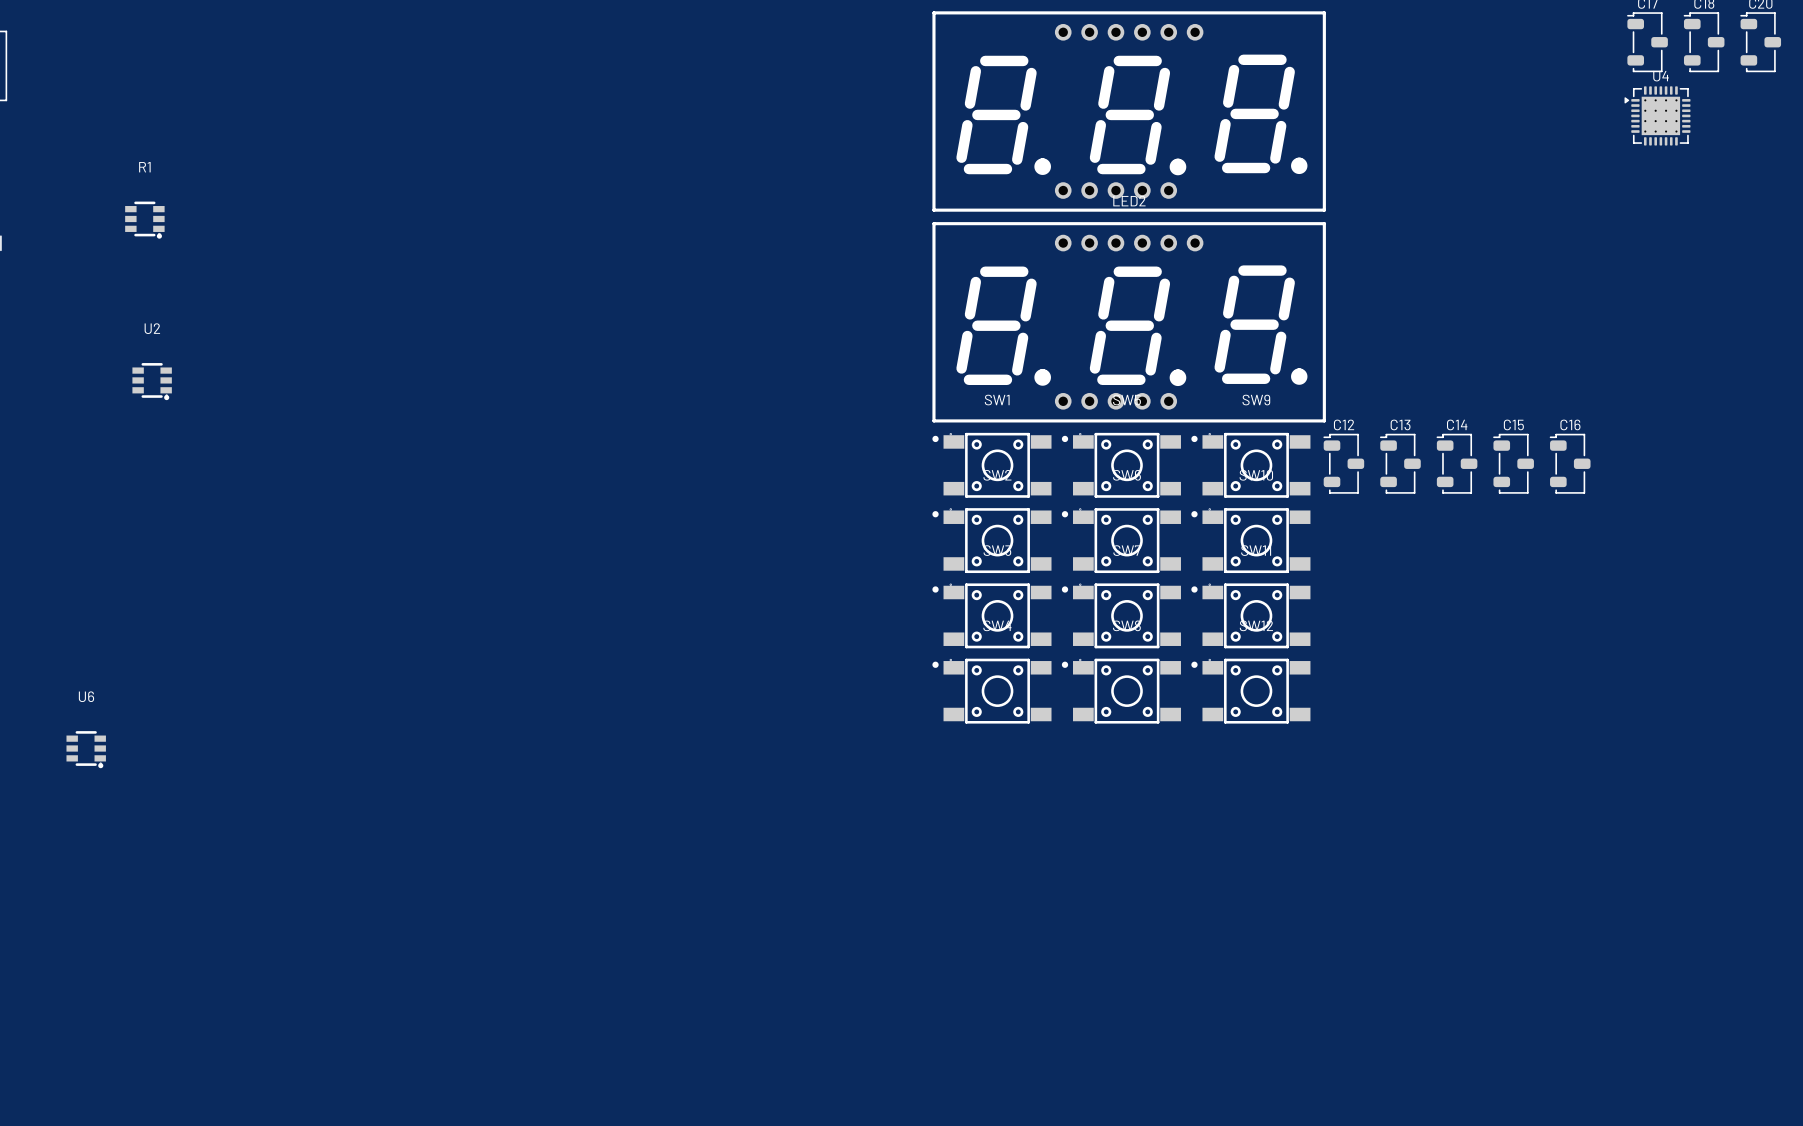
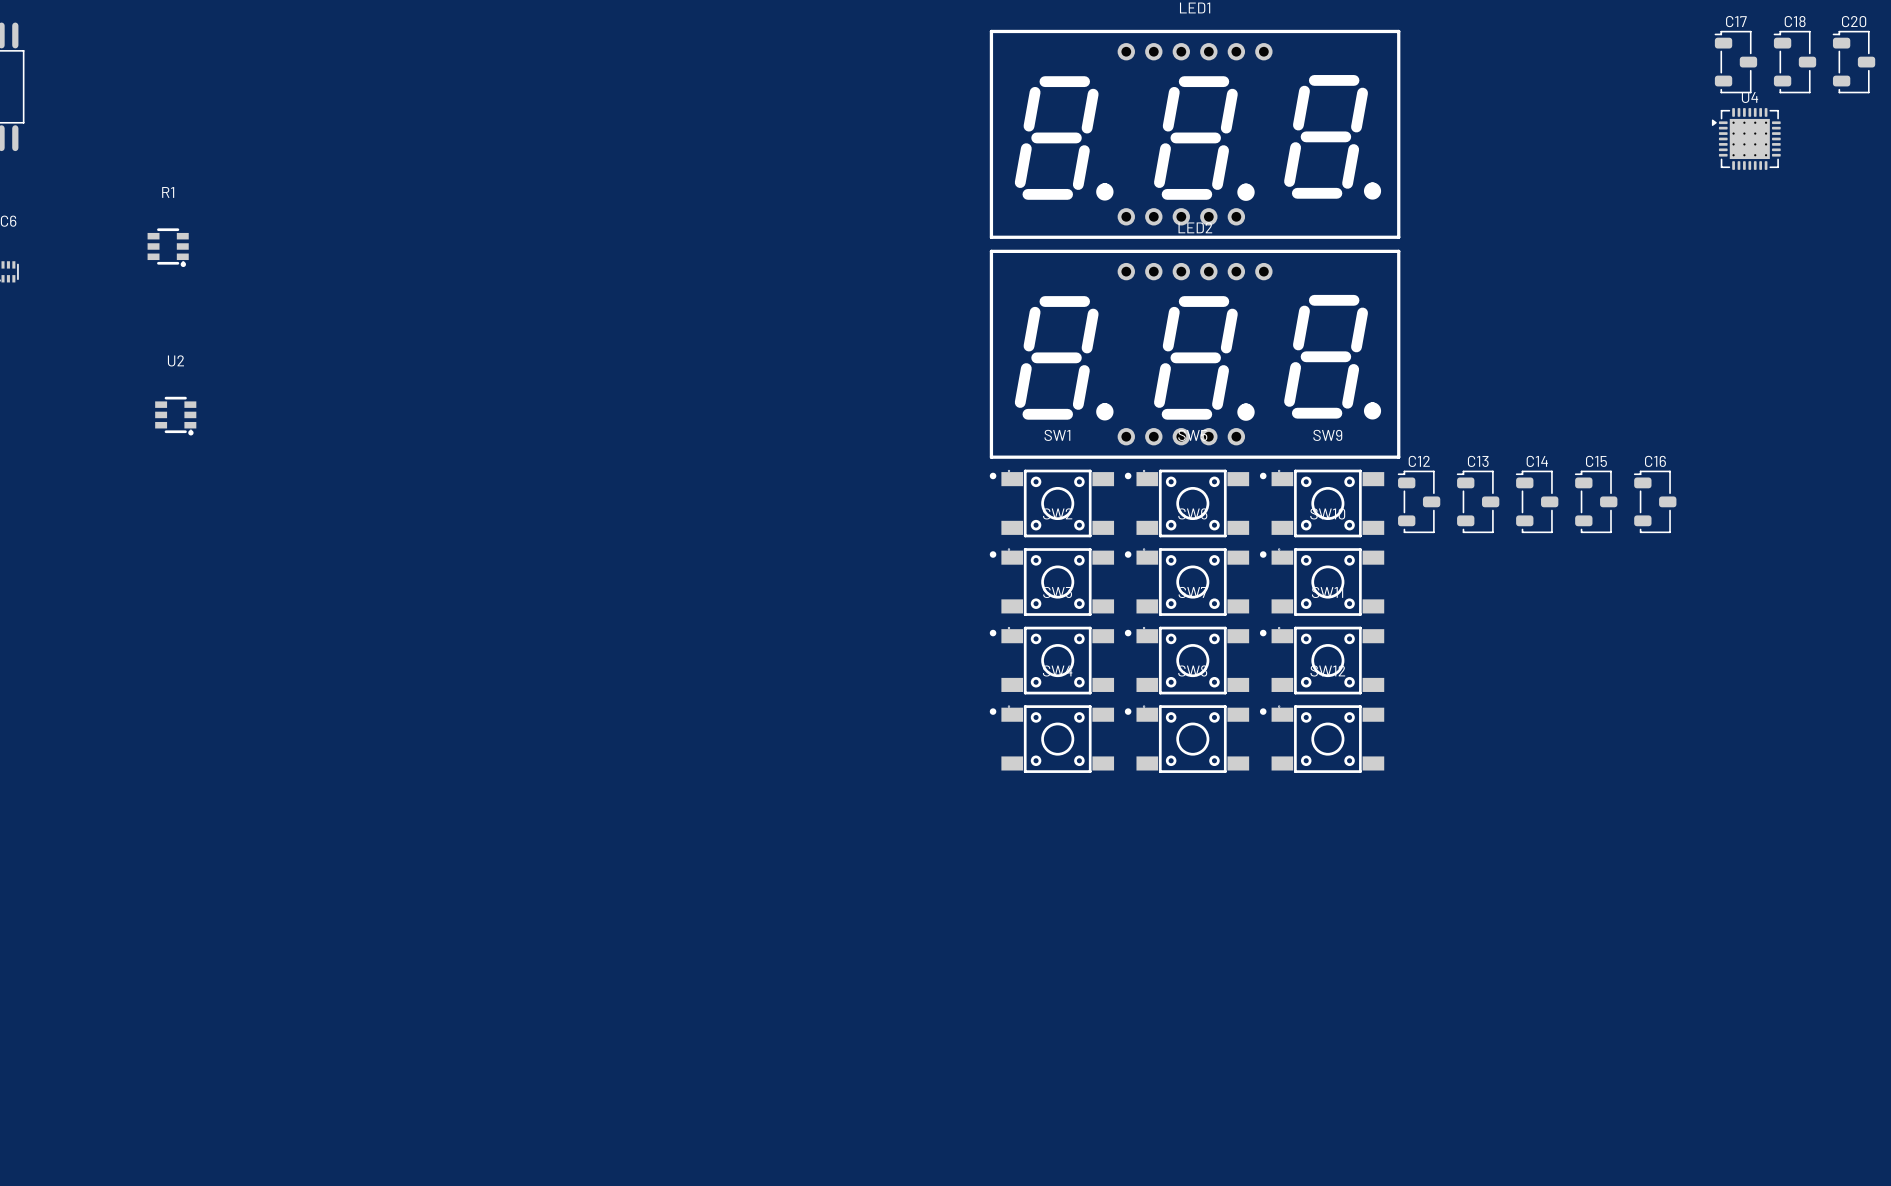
U6: (86, 749) -> none

